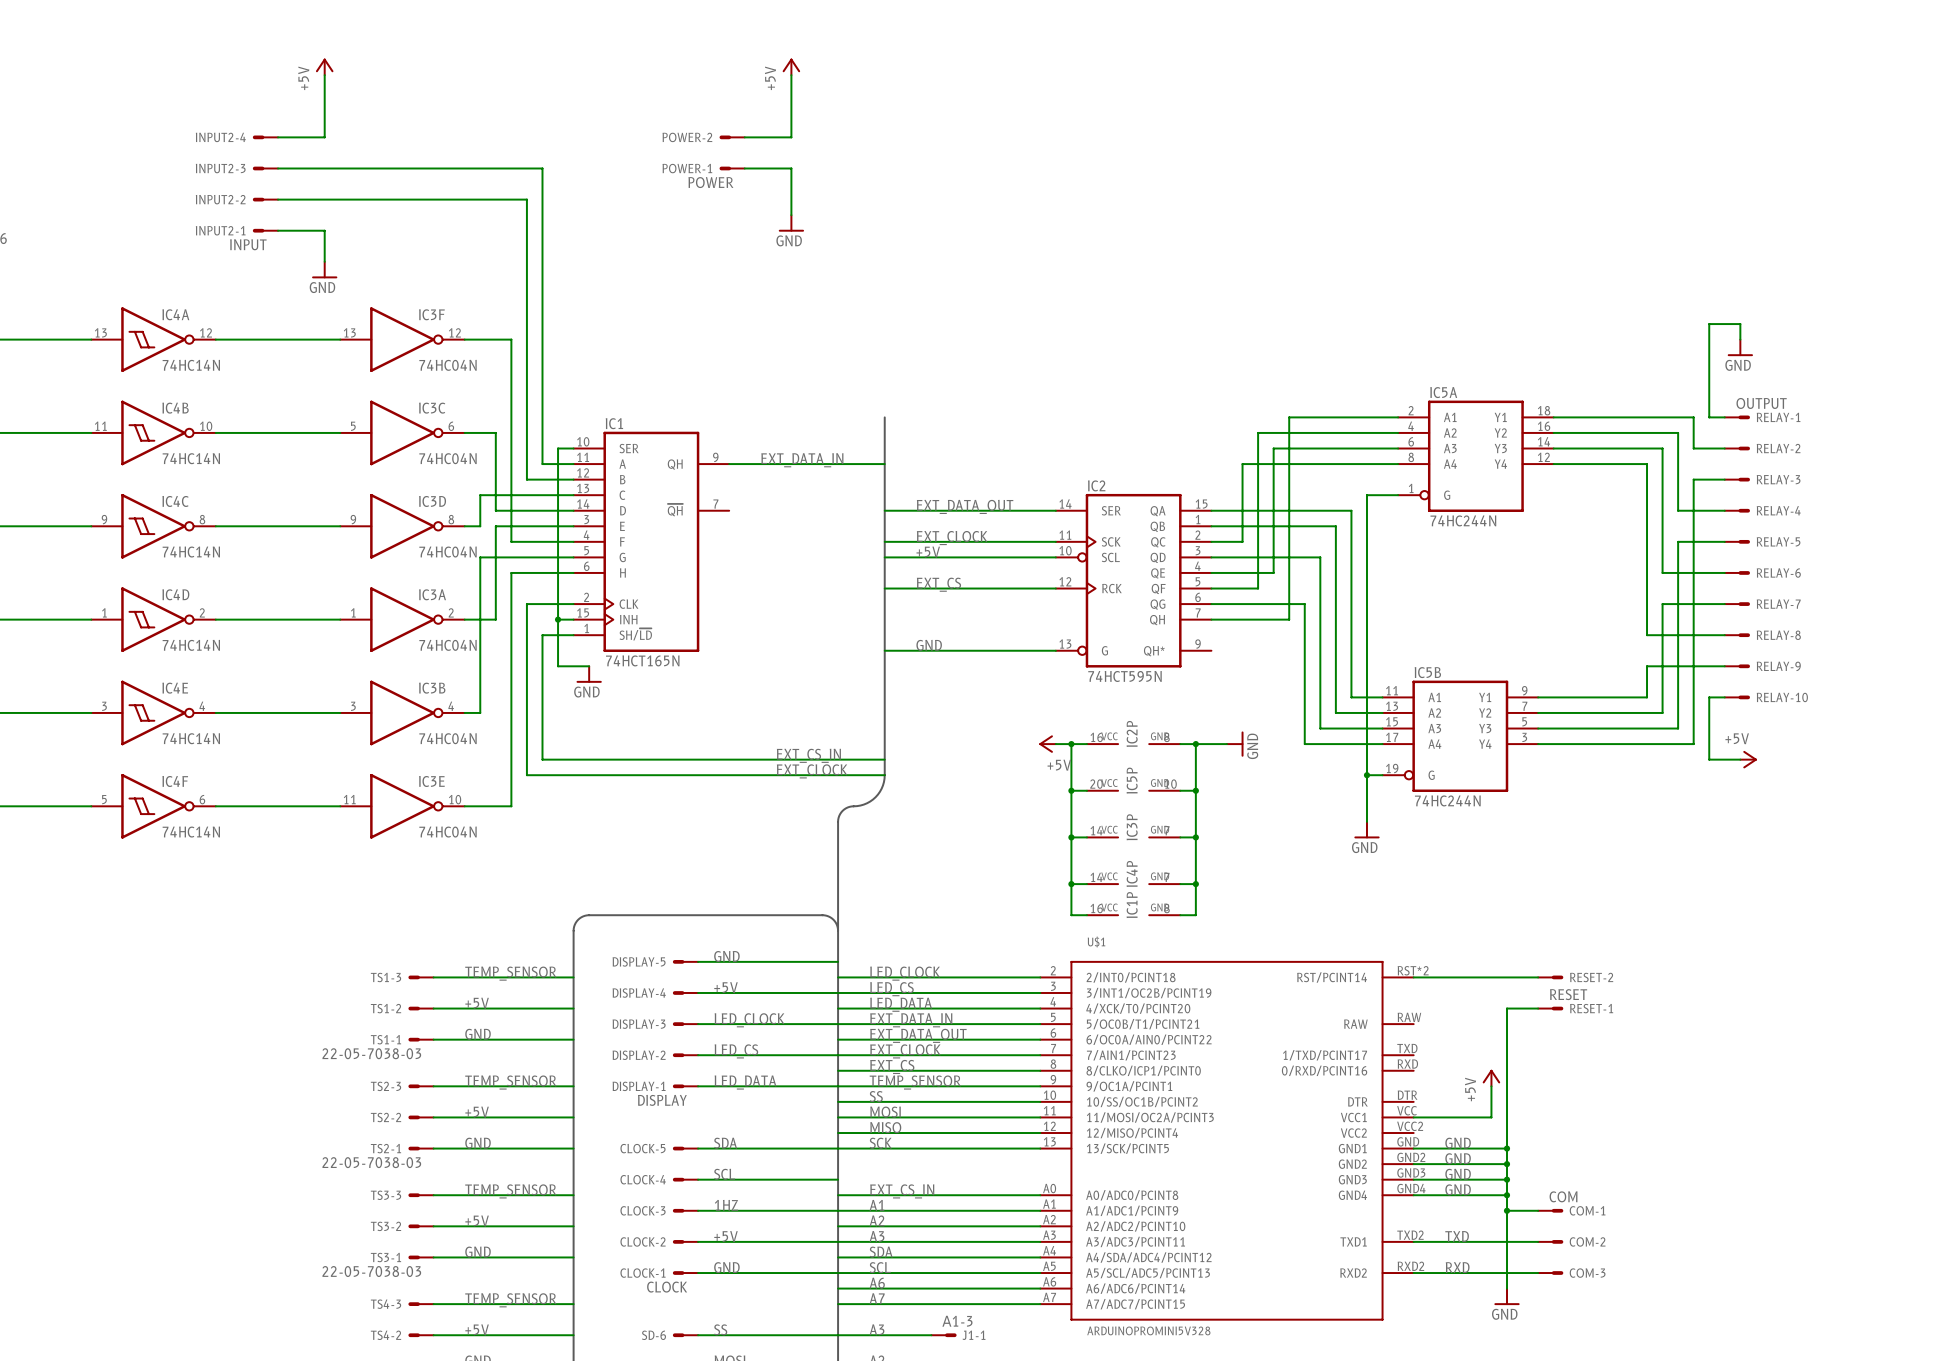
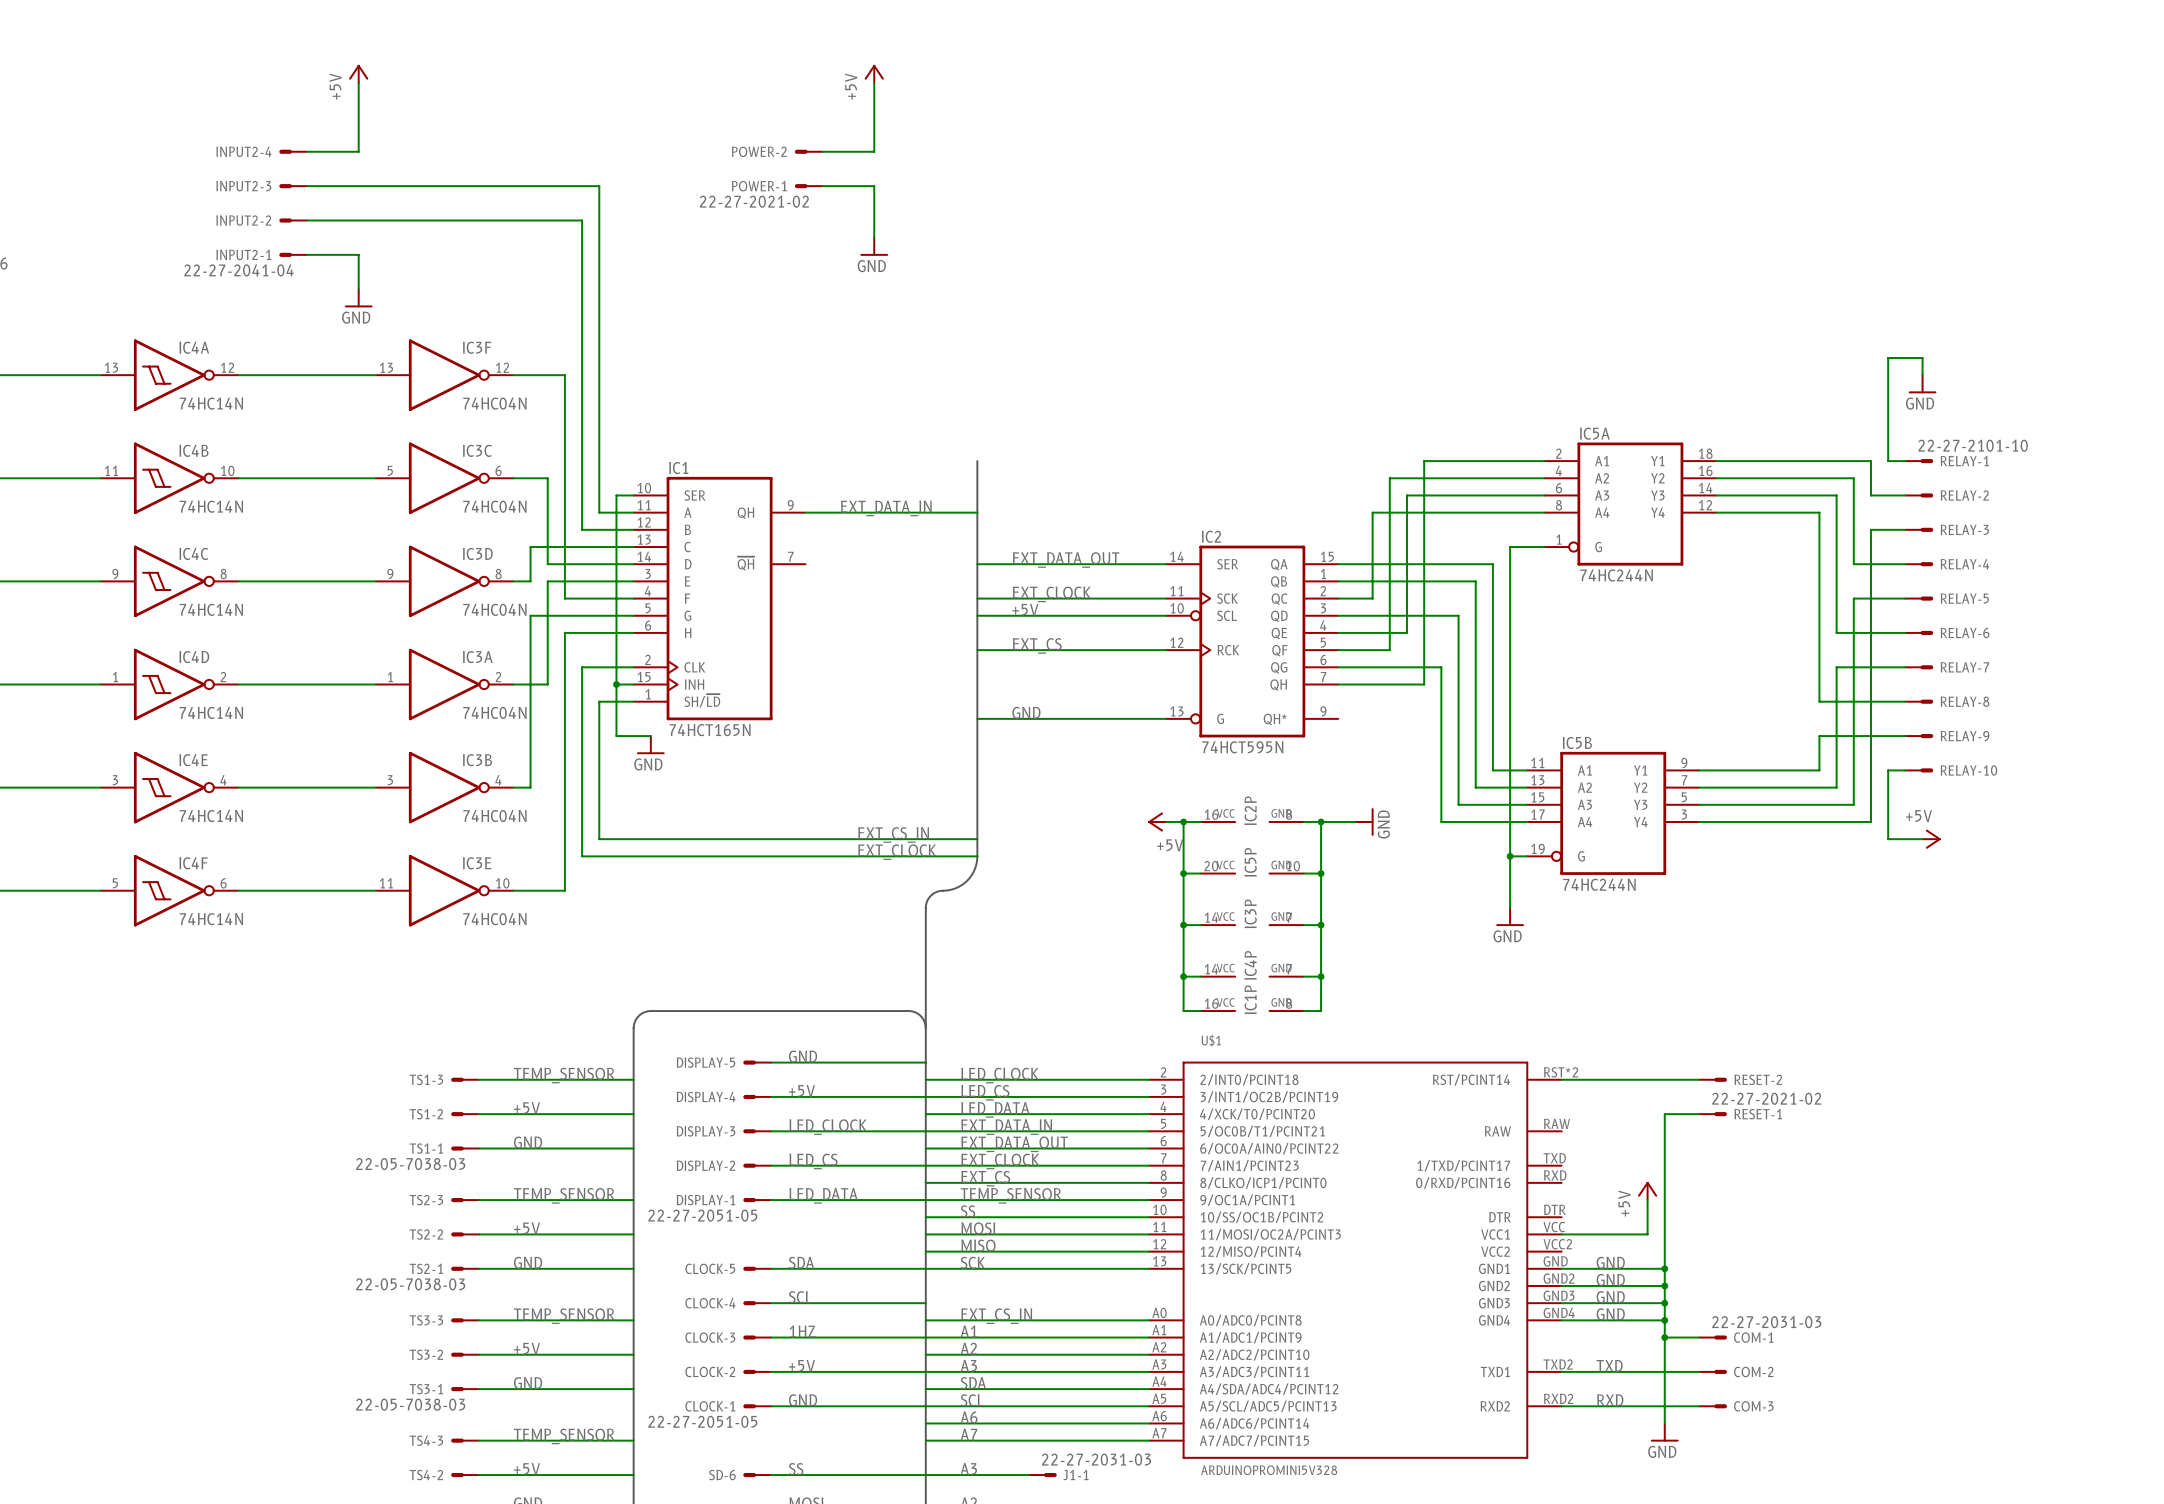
POWER-1 value: POWER (710, 182) -> 22-27-2021-02 (754, 201)
INPUT2-1 value: INPUT (248, 244) -> 22-27-2041-04 (239, 270)
RELAY-1 value: OUTPUT (1761, 403) -> 22-27-2101-10 (1973, 445)
RESET-1 value: RESET (1568, 994) -> 22-27-2021-02 (1766, 1098)
DISPLAY-1 value: DISPLAY (662, 1100) -> 22-27-2051-05 (702, 1215)
COM-1 value: COM (1563, 1196) -> 22-27-2031-03 (1766, 1322)
CLOCK-1 value: CLOCK (667, 1287) -> 22-27-2051-05 (702, 1421)
J1-1 value: А1-3 (957, 1321) -> 22-27-2031-03 (1096, 1459)

